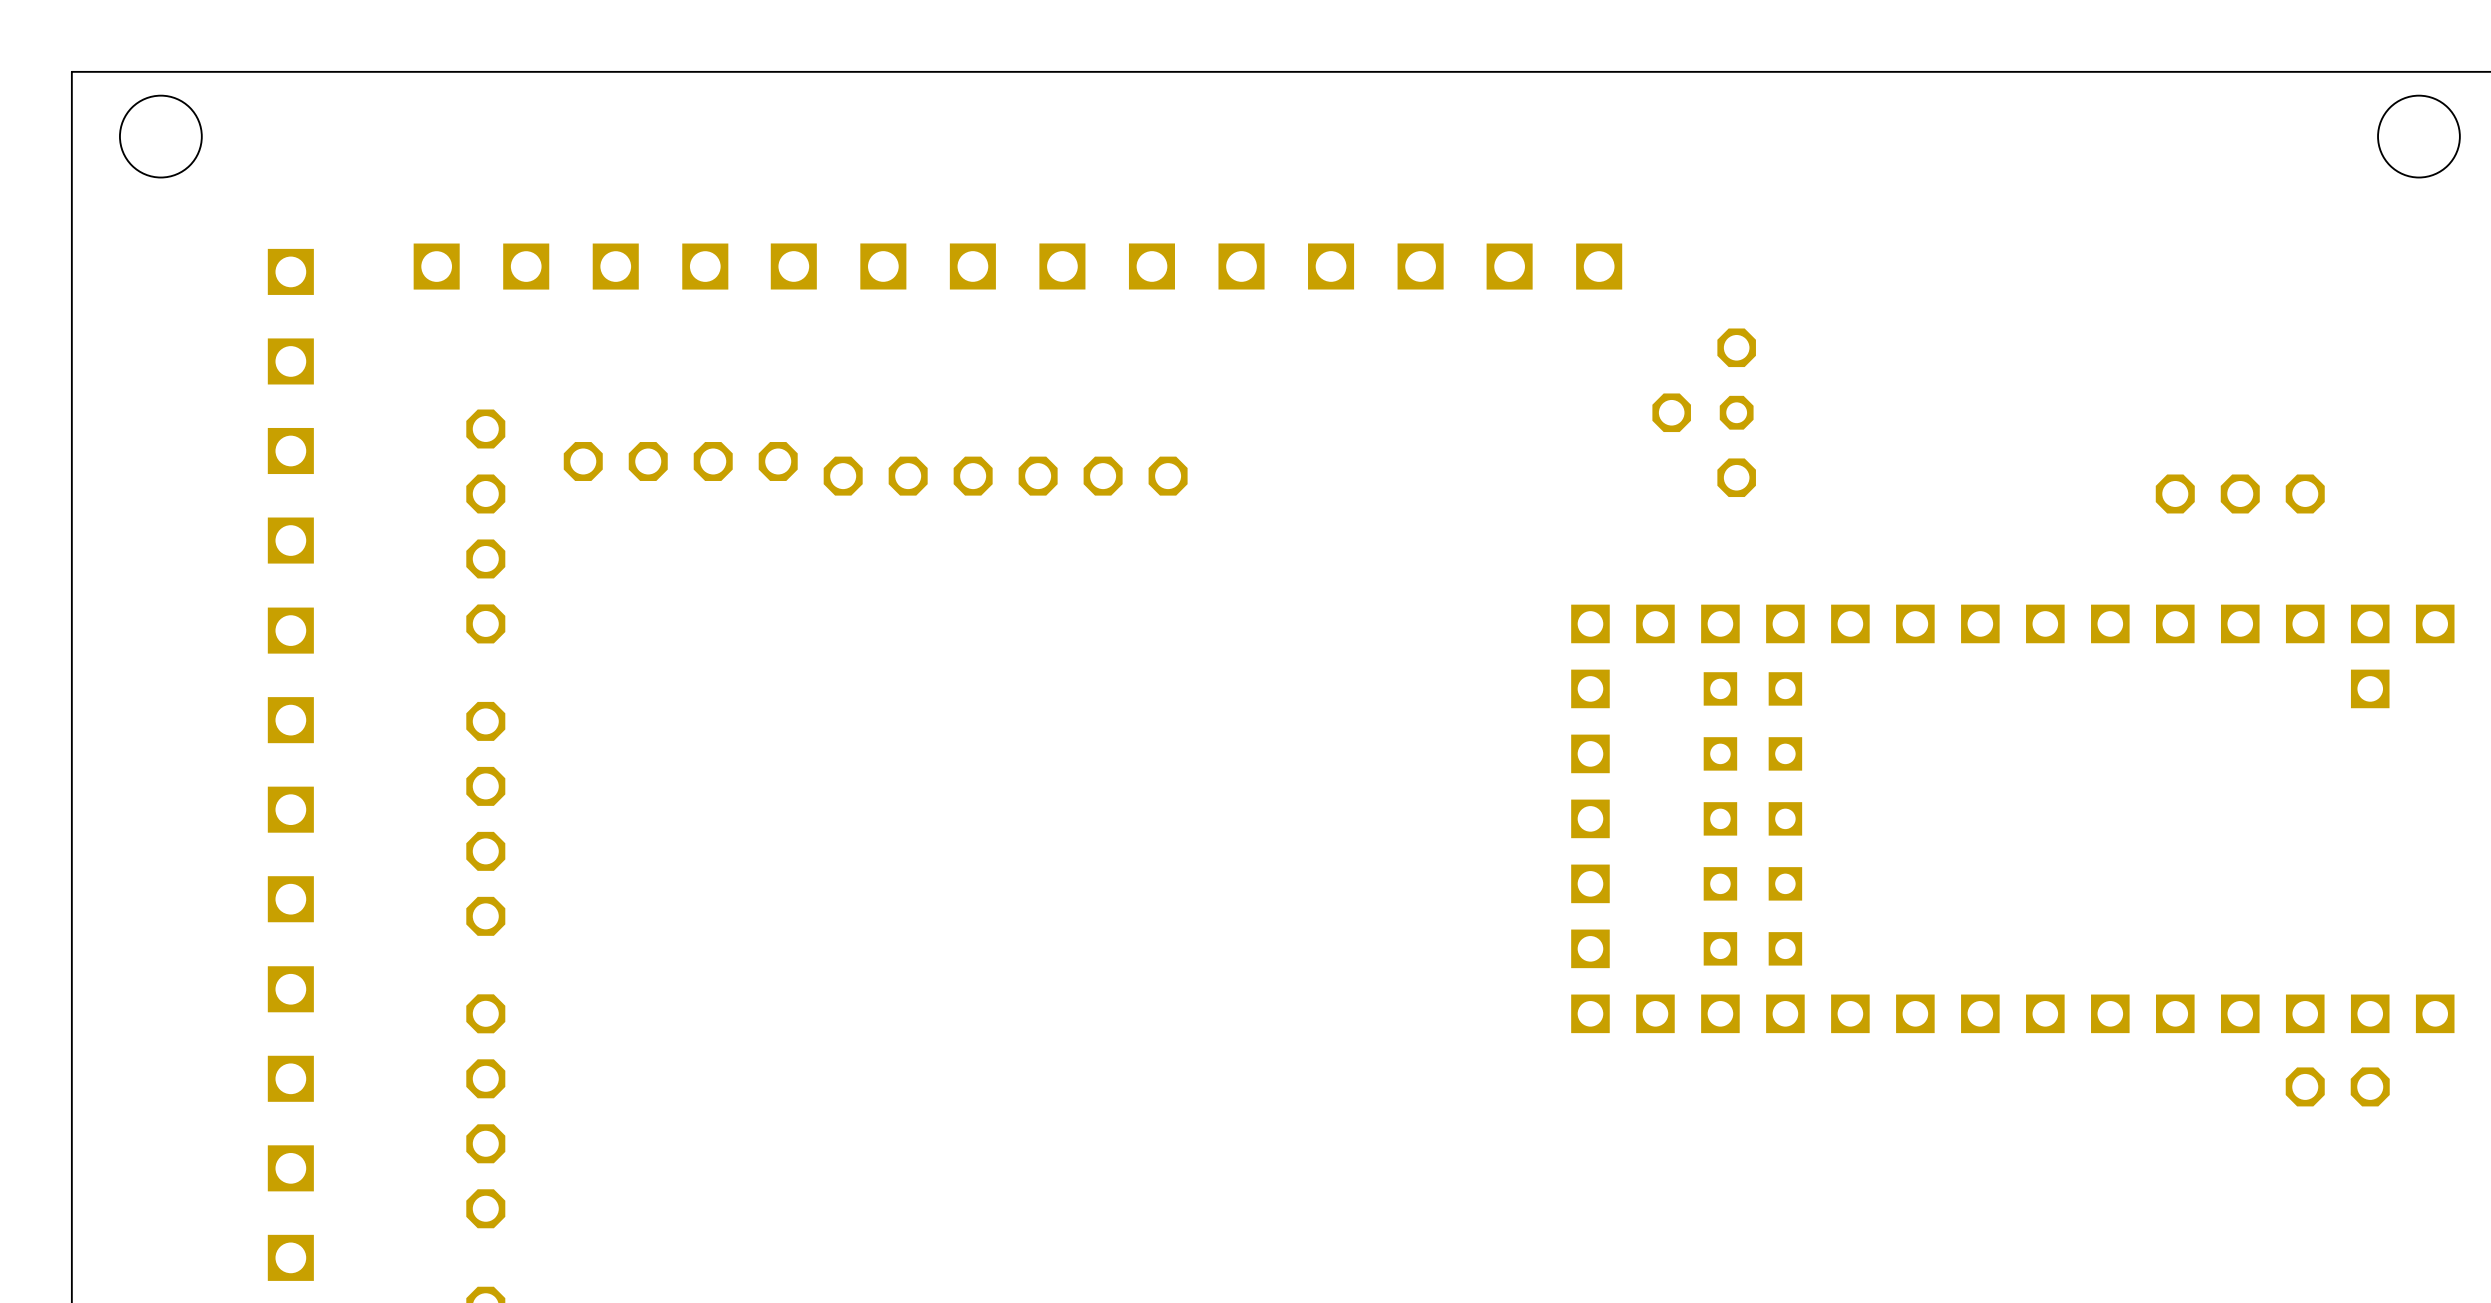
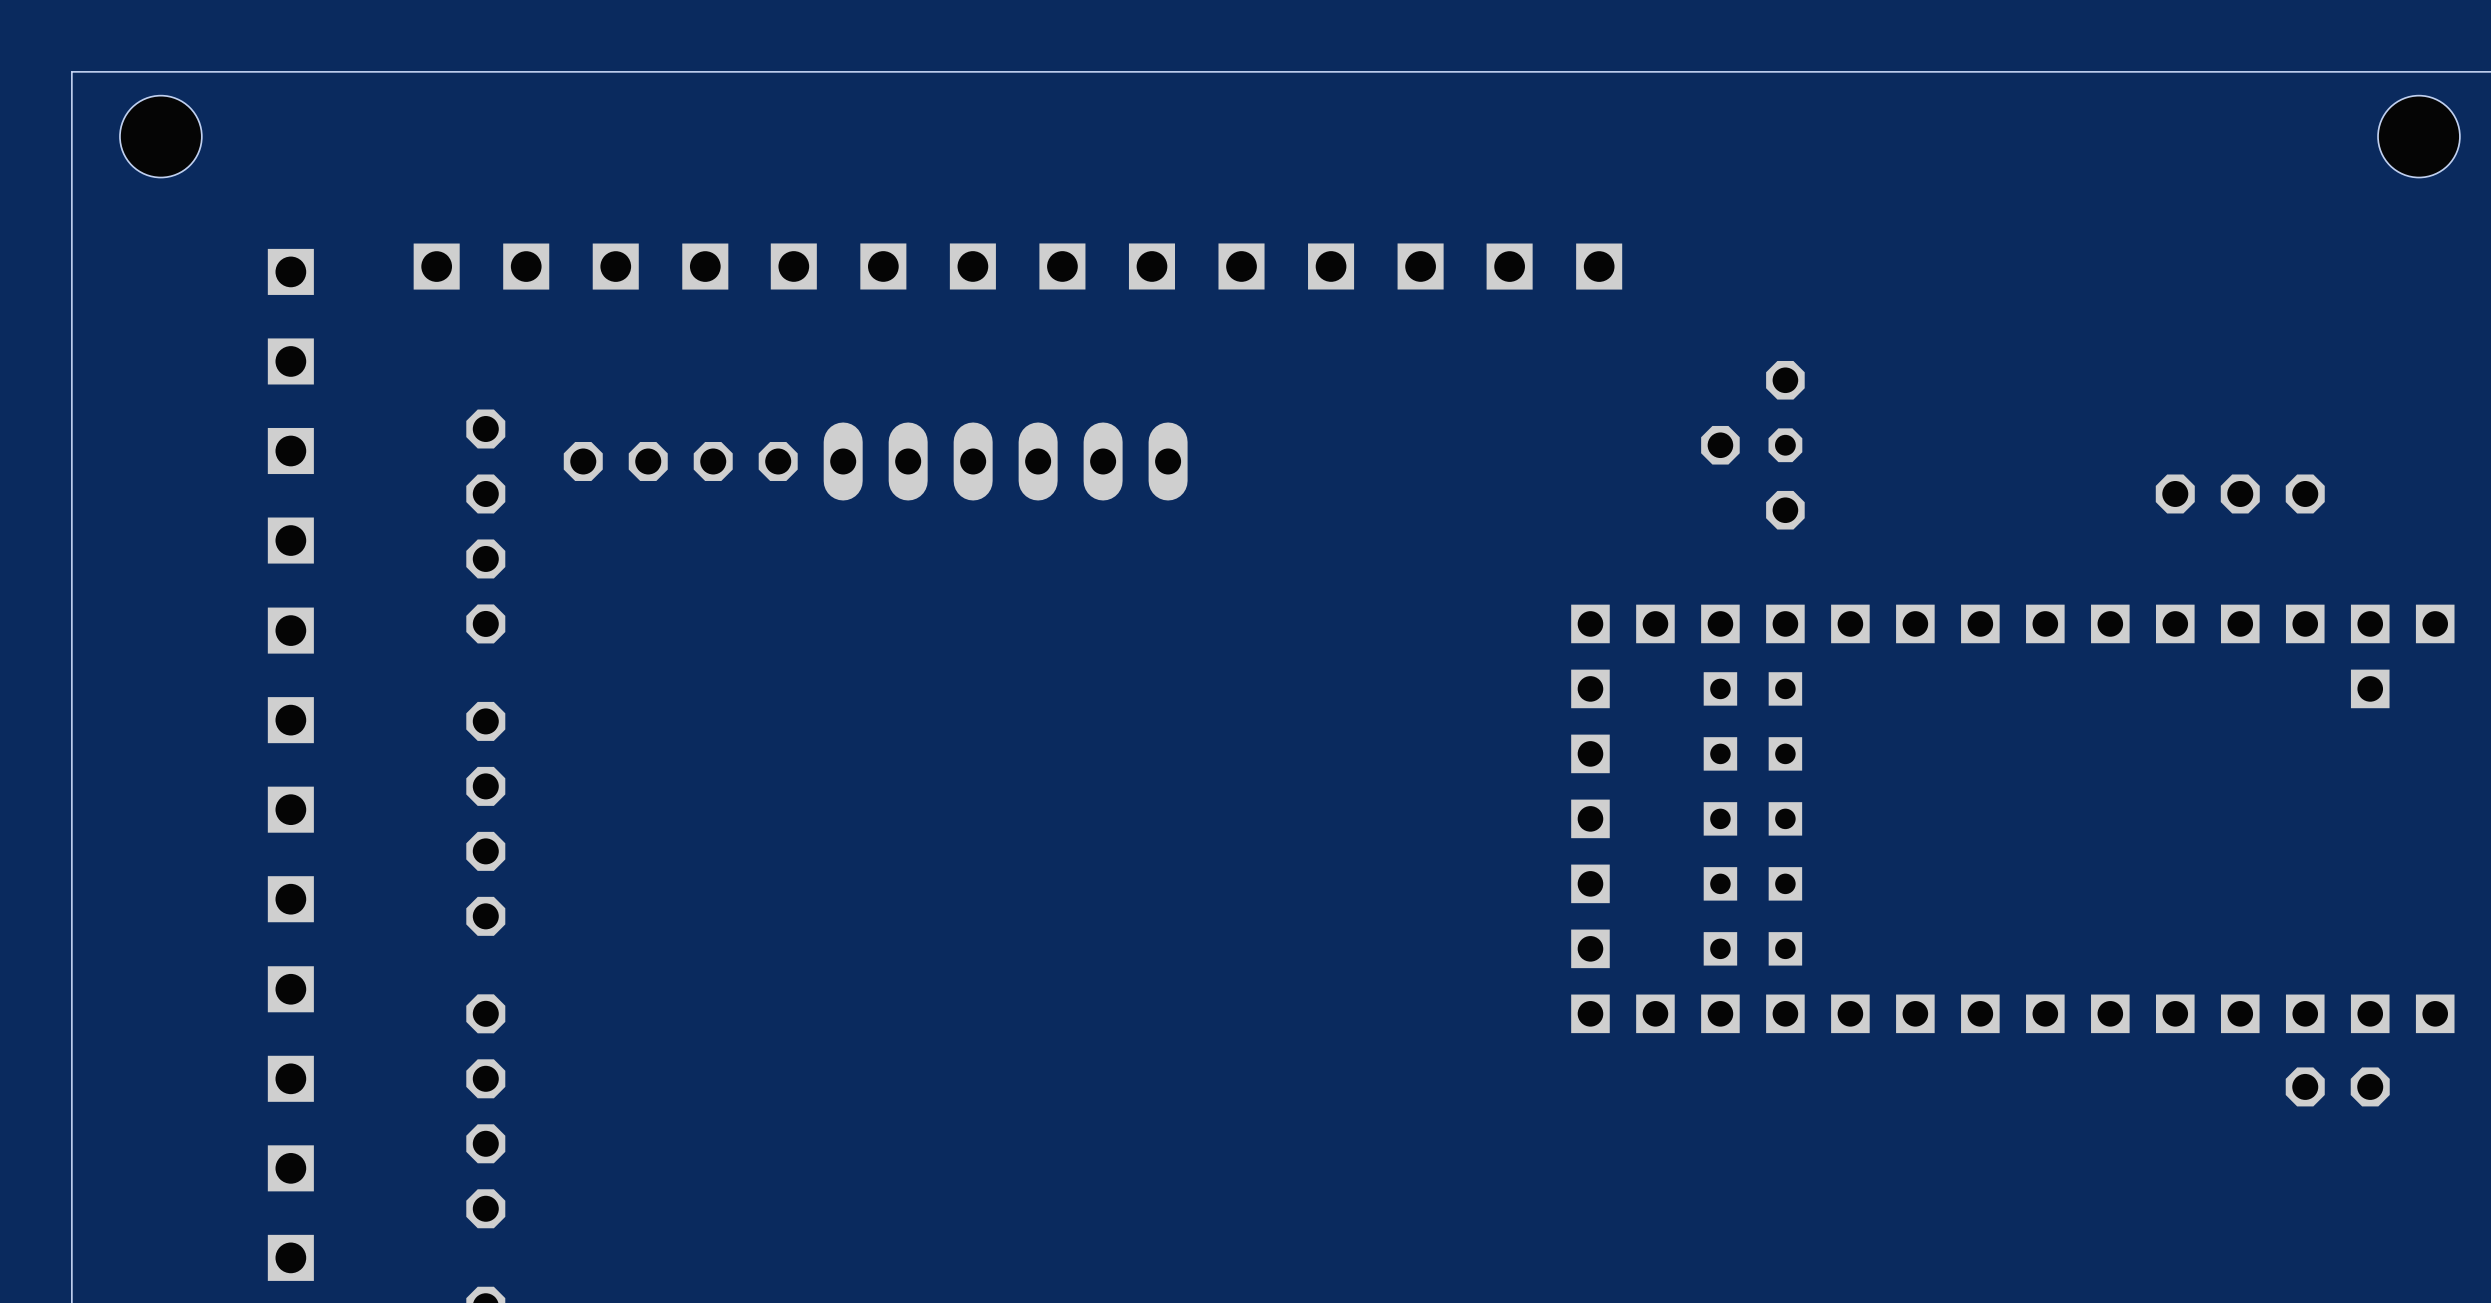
part position: (1704, 412) -> (1752, 445)
part footprint: [823, 456, 1188, 496] -> [823, 422, 1188, 501]

